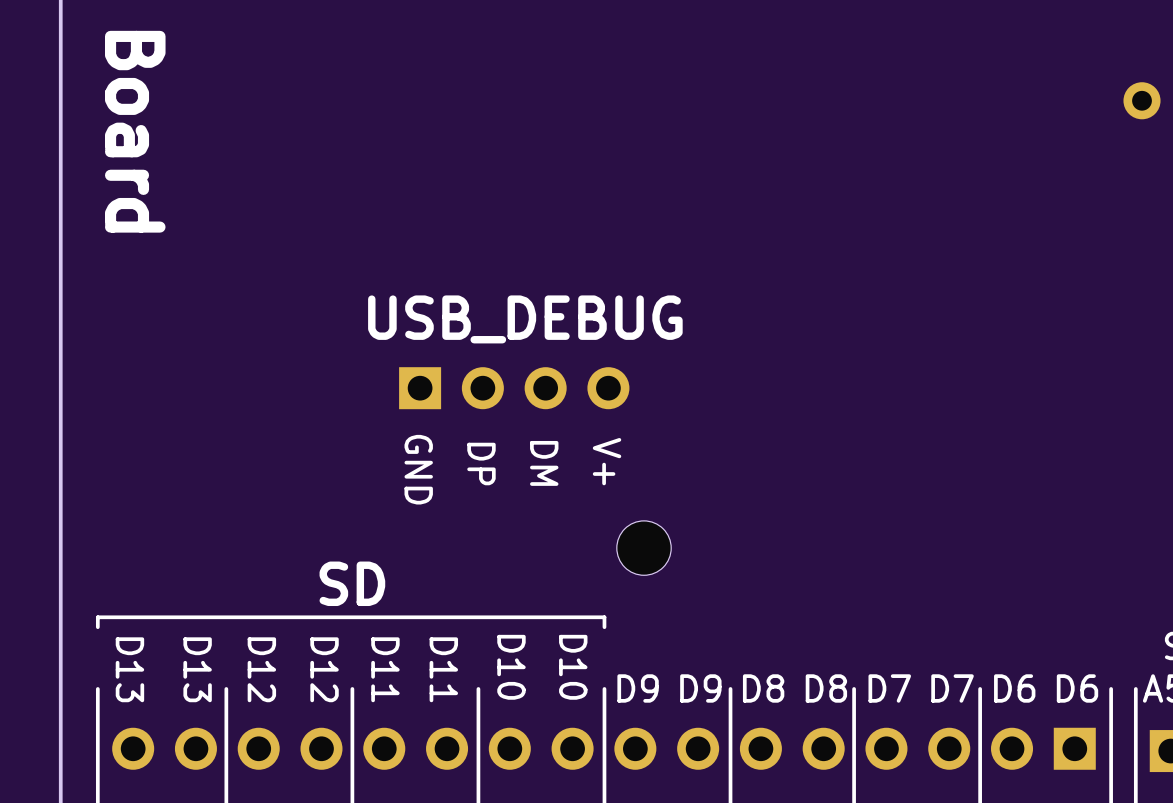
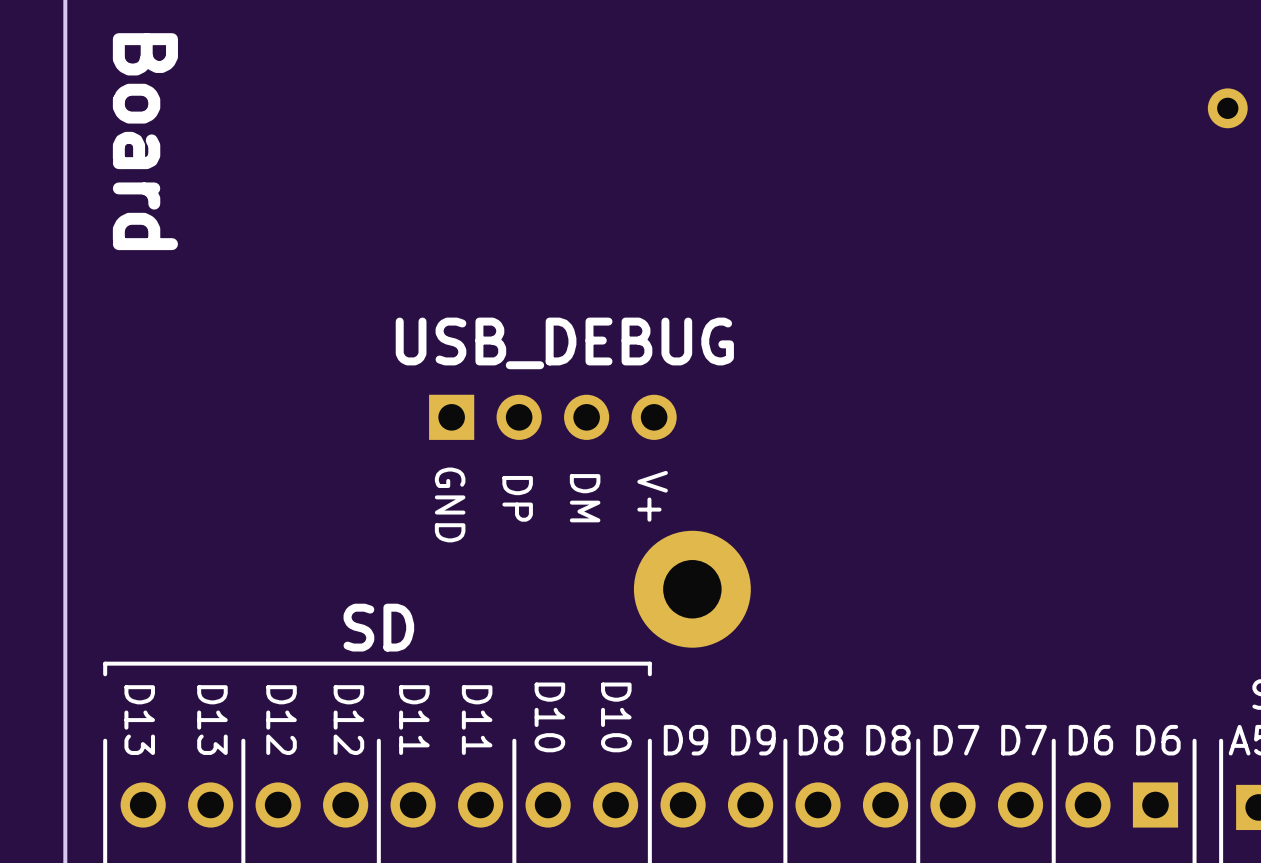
part footprint: [616, 520, 672, 576] -> [633, 530, 751, 648]

